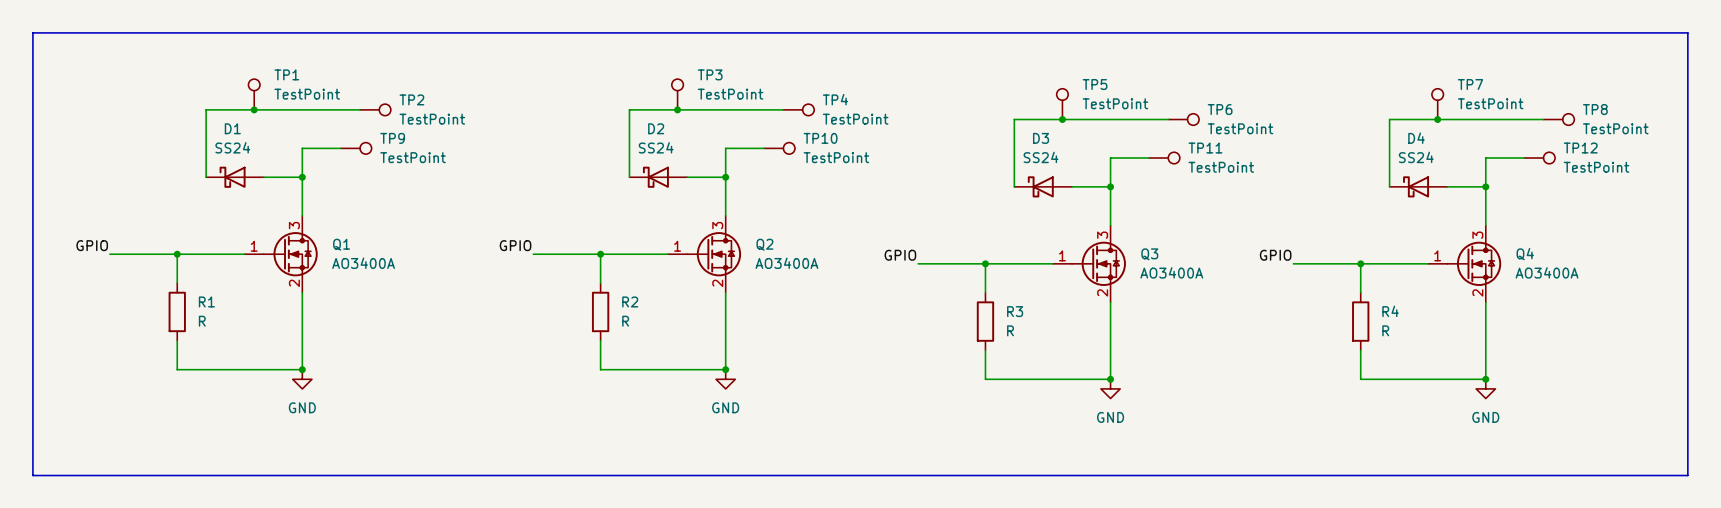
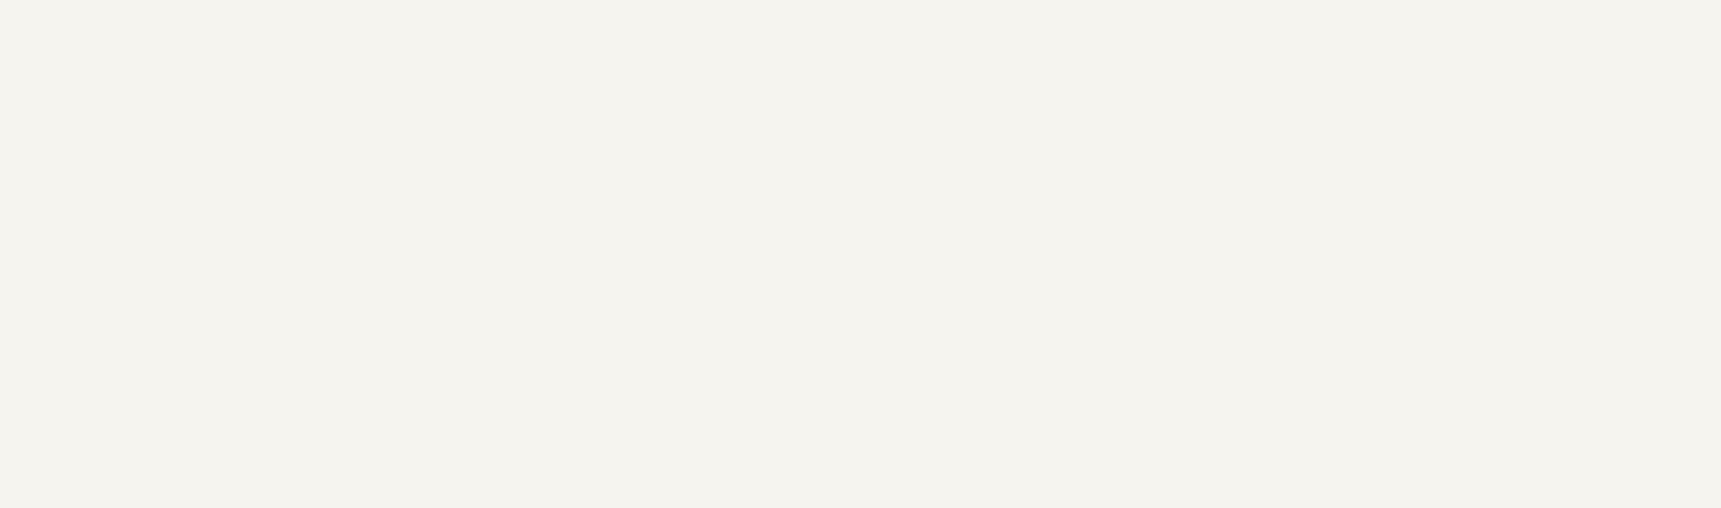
line: (32, 32) (1687, 32) (1687, 475) (32, 475) (32, 32) -> none
TP1: TestPoint (254, 94) -> none
TP3: TestPoint (677, 94) -> none
TP5: TestPoint (1062, 104) -> none
TP7: TestPoint (1437, 104) -> none
junction: (254, 109) -> none
wire: (360, 109) (206, 109) (206, 177) -> none
TP2: TestPoint (375, 109) -> none
junction: (677, 109) -> none
wire: (783, 109) (629, 109) (629, 177) -> none
TP4: TestPoint (798, 109) -> none
junction: (1062, 119) -> none
wire: (1168, 119) (1014, 119) (1014, 186) -> none
TP6: TestPoint (1183, 119) -> none
junction: (1437, 119) -> none
wire: (1543, 119) (1389, 119) (1389, 186) -> none
TP8: TestPoint (1558, 119) -> none
wire: (340, 148) (302, 148) (302, 215) -> none
TP9: TestPoint (356, 148) -> none
wire: (764, 148) (725, 148) (725, 215) -> none
TP10: TestPoint (779, 148) -> none
wire: (1149, 158) (1110, 158) (1110, 225) -> none
TP11: TestPoint (1164, 158) -> none
wire: (1524, 158) (1485, 158) (1485, 225) -> none
TP12: TestPoint (1539, 158) -> none
D1: SS24 (234, 177) -> none
wire: (263, 177) (302, 177) -> none
junction: (302, 177) -> none
D2: SS24 (658, 177) -> none
wire: (687, 177) (725, 177) -> none
junction: (725, 177) -> none
D3: SS24 (1043, 186) -> none
wire: (1072, 186) (1110, 186) -> none
junction: (1110, 186) -> none
D4: SS24 (1418, 186) -> none
wire: (1447, 186) (1485, 186) -> none
junction: (1485, 186) -> none
label: GPIO (92, 245) -> none
label: GPIO (515, 245) -> none
wire: (109, 254) (244, 254) -> none
wire: (177, 254) (177, 283) -> none
junction: (177, 254) -> none
Q1: AO3400A (281, 254) -> none
wire: (533, 254) (667, 254) -> none
wire: (600, 254) (600, 283) -> none
junction: (600, 254) -> none
Q2: AO3400A (704, 254) -> none
label: GPIO (900, 255) -> none
label: GPIO (1275, 255) -> none
wire: (918, 263) (1052, 263) -> none
wire: (985, 263) (985, 292) -> none
junction: (985, 263) -> none
Q3: AO3400A (1089, 263) -> none
wire: (1293, 263) (1428, 263) -> none
wire: (1360, 263) (1360, 292) -> none
junction: (1360, 263) -> none
Q4: AO3400A (1464, 263) -> none
wire: (302, 292) (302, 369) (177, 369) (177, 340) -> none
wire: (725, 292) (725, 369) (600, 369) (600, 340) -> none
wire: (1110, 302) (1110, 379) (985, 379) (985, 350) -> none
wire: (1485, 302) (1485, 379) (1360, 379) (1360, 350) -> none
R1: R (177, 311) -> none
R2: R (600, 311) -> none
R3: R (985, 321) -> none
R4: R (1360, 321) -> none
junction: (302, 369) -> none
junction: (725, 369) -> none
power symbol: GND (302, 379) -> none
power symbol: GND (725, 379) -> none
junction: (1110, 379) -> none
junction: (1485, 379) -> none
power symbol: GND (1110, 388) -> none
power symbol: GND (1485, 388) -> none

